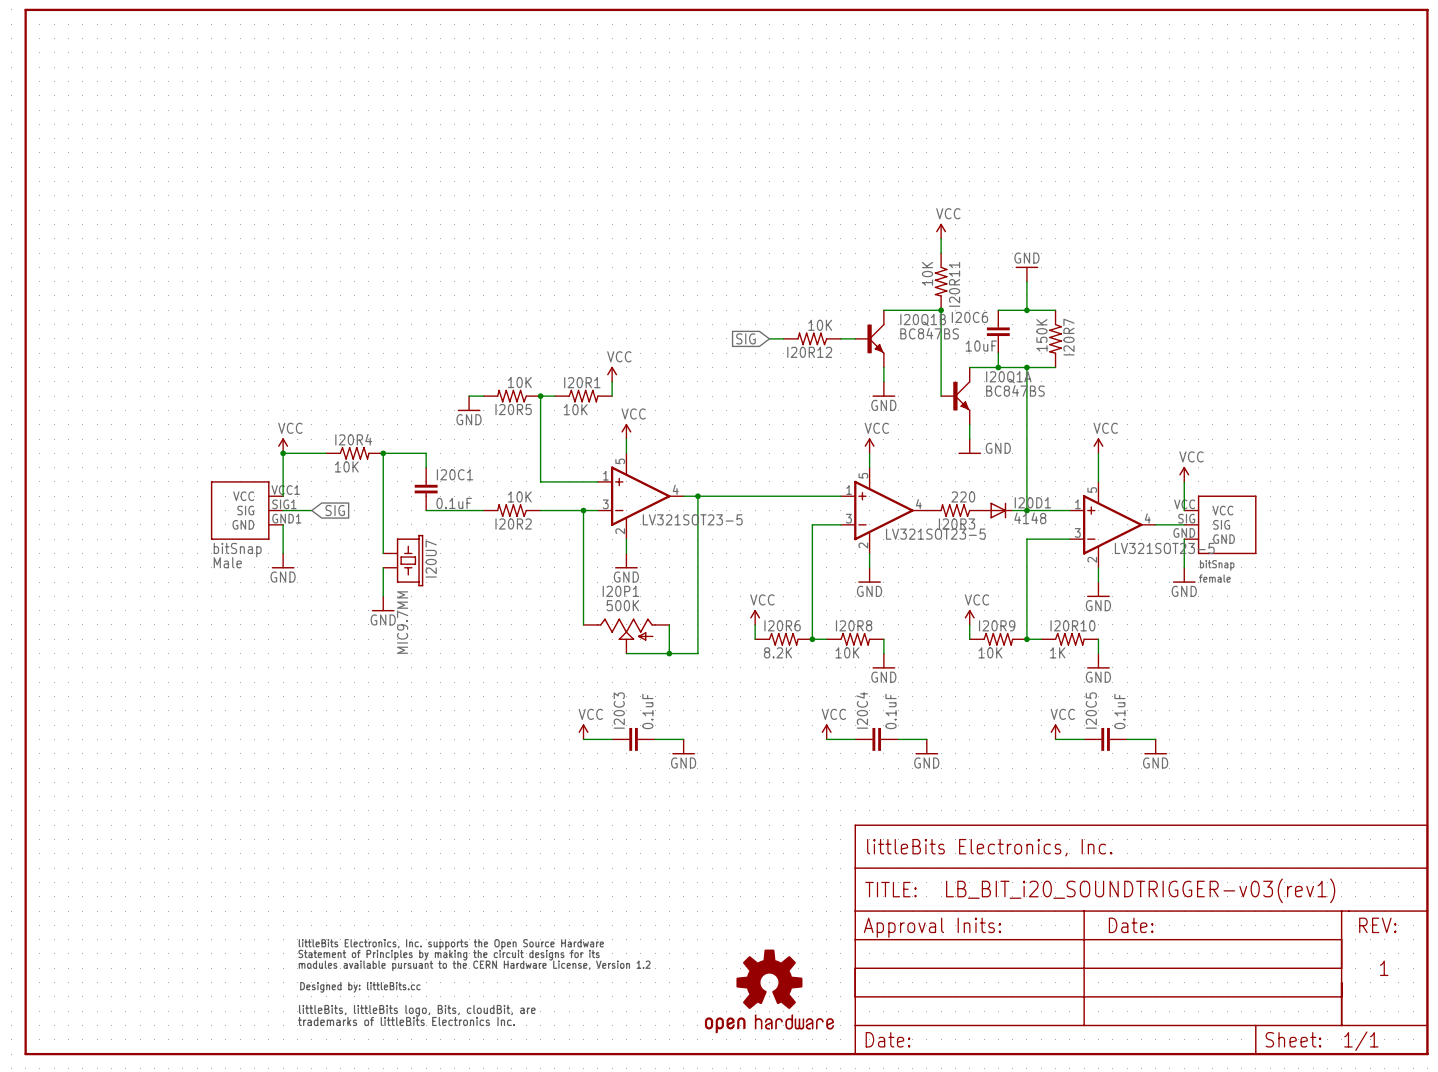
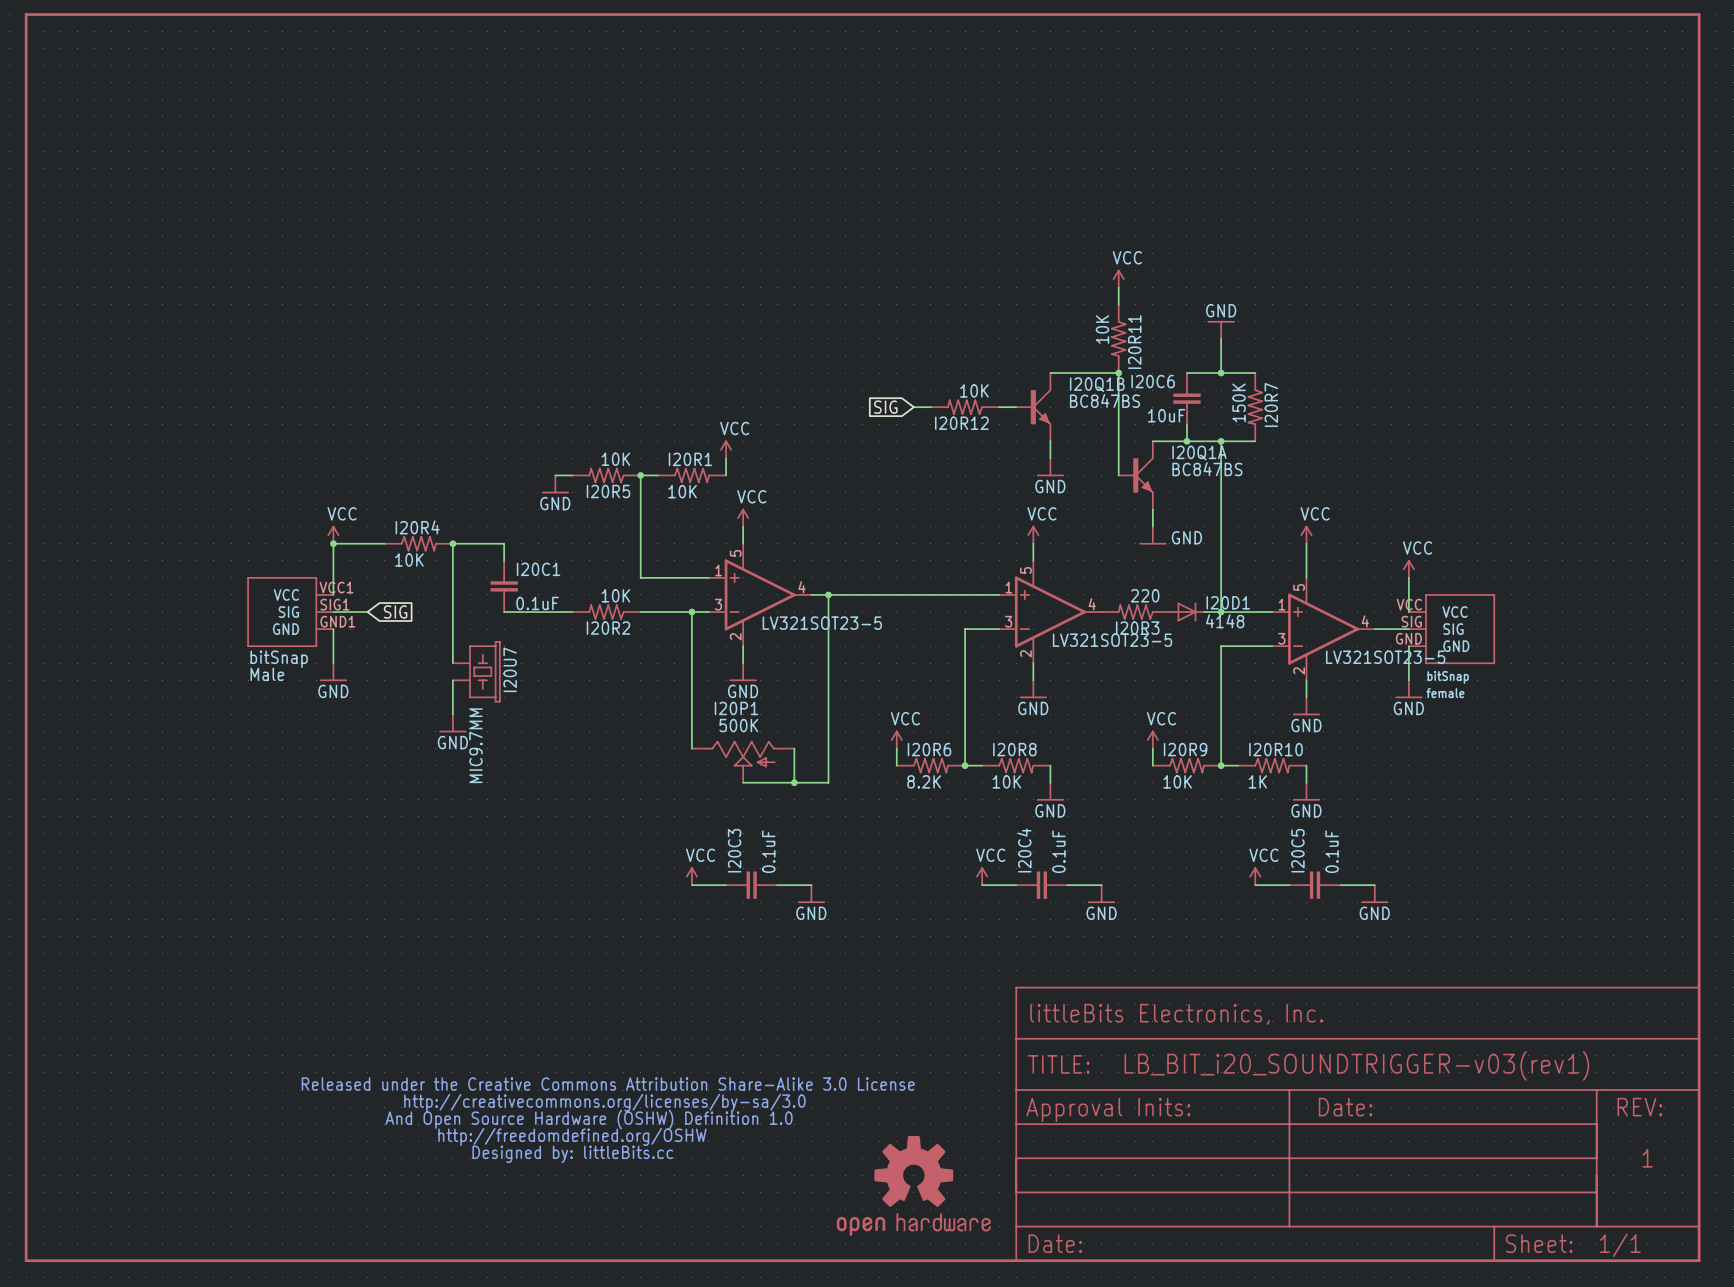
part: none -> (608, 1120)
part: (474, 982) -> none

